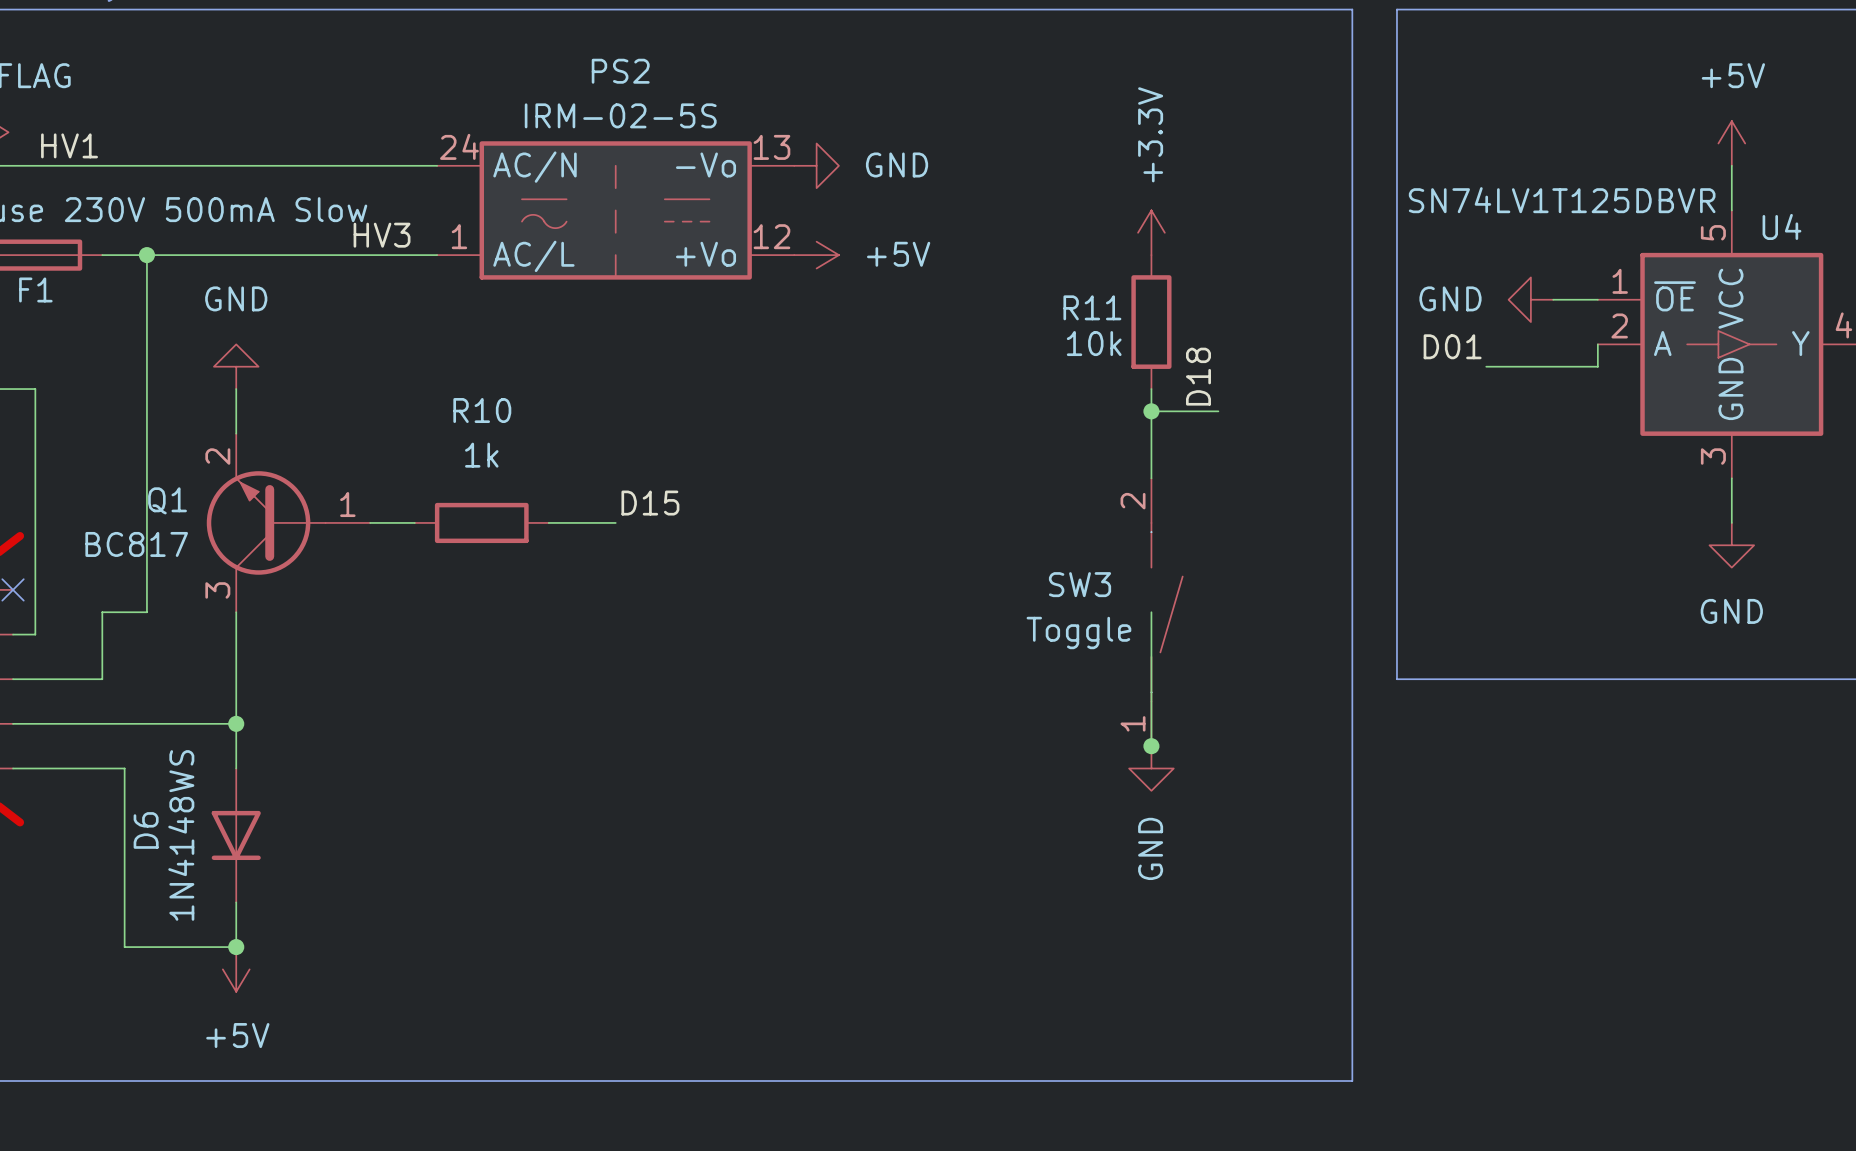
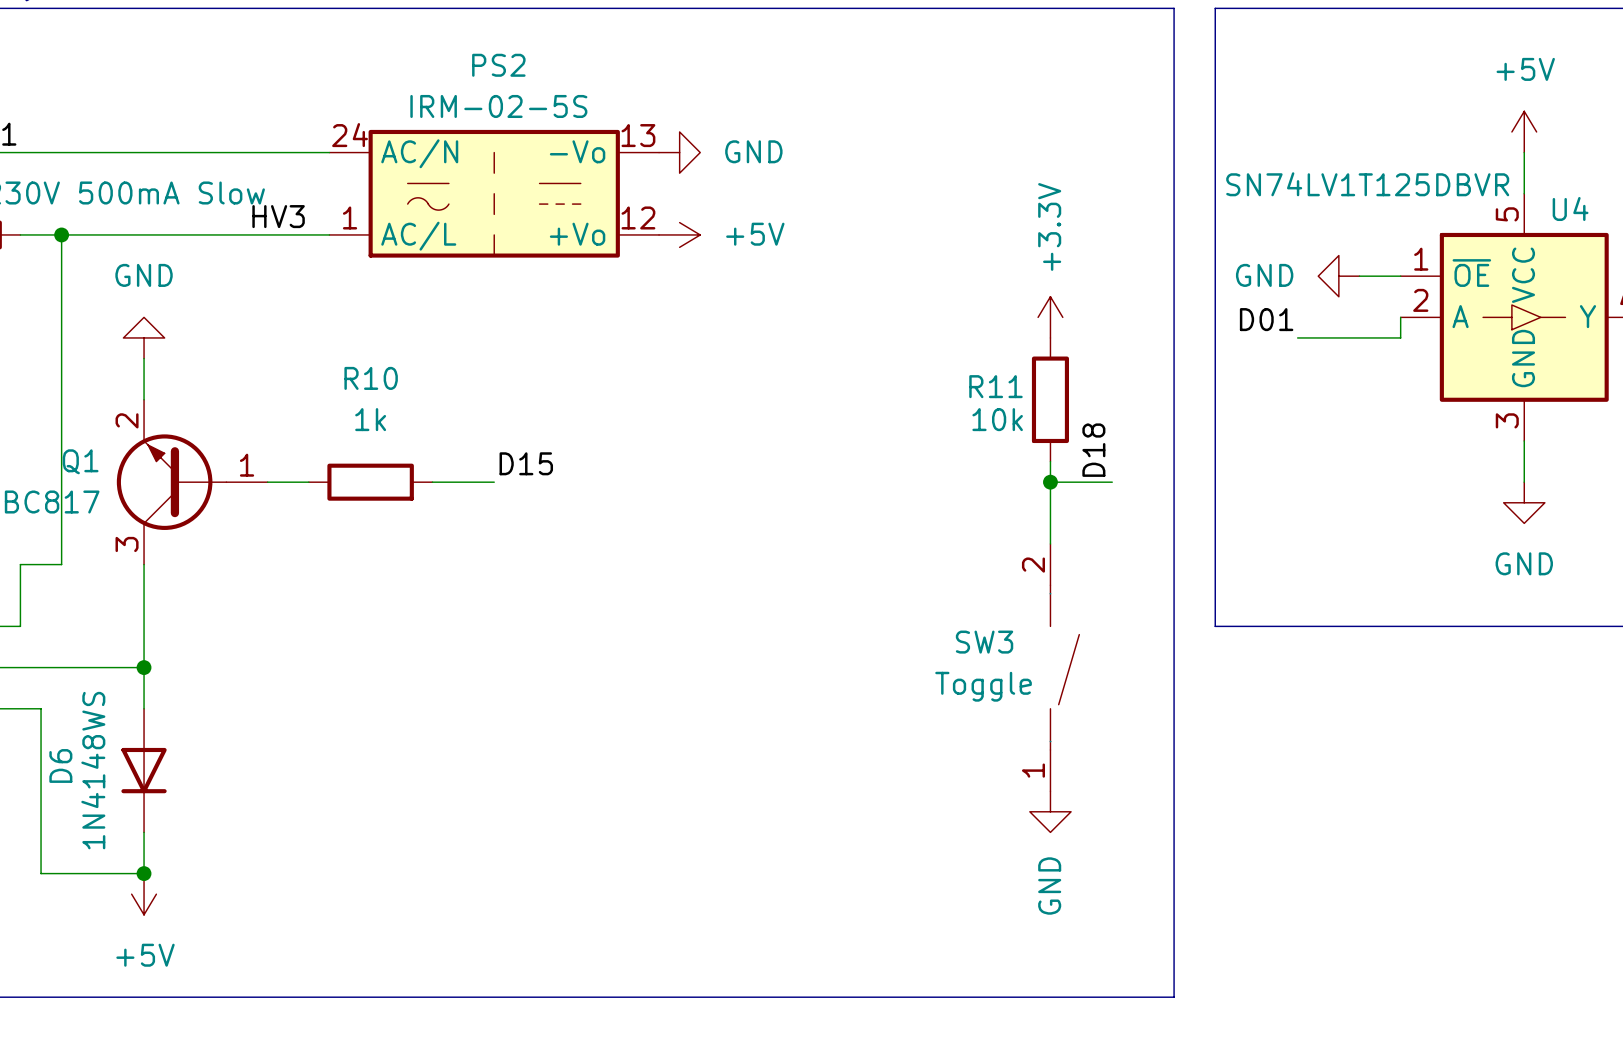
power symbol position: +3.3V (1151, 232) -> +3.3V (1050, 317)
R11 position: (1151, 322) -> (1050, 399)
label position: D18 (1198, 376) -> D18 (1093, 450)
wire: (1151, 389) (1151, 478) -> (1050, 461) (1050, 543)
wire: (1151, 411) (1218, 411) -> (1050, 482) (1112, 482)
junction: (1151, 411) -> none
junction: none -> (1050, 482)
wire: (1151, 612) (1151, 746) -> none
SW3 position: (1167, 612) -> (1064, 667)
junction: (1151, 746) -> none
power symbol position: GND (1151, 768) -> GND (1050, 811)

